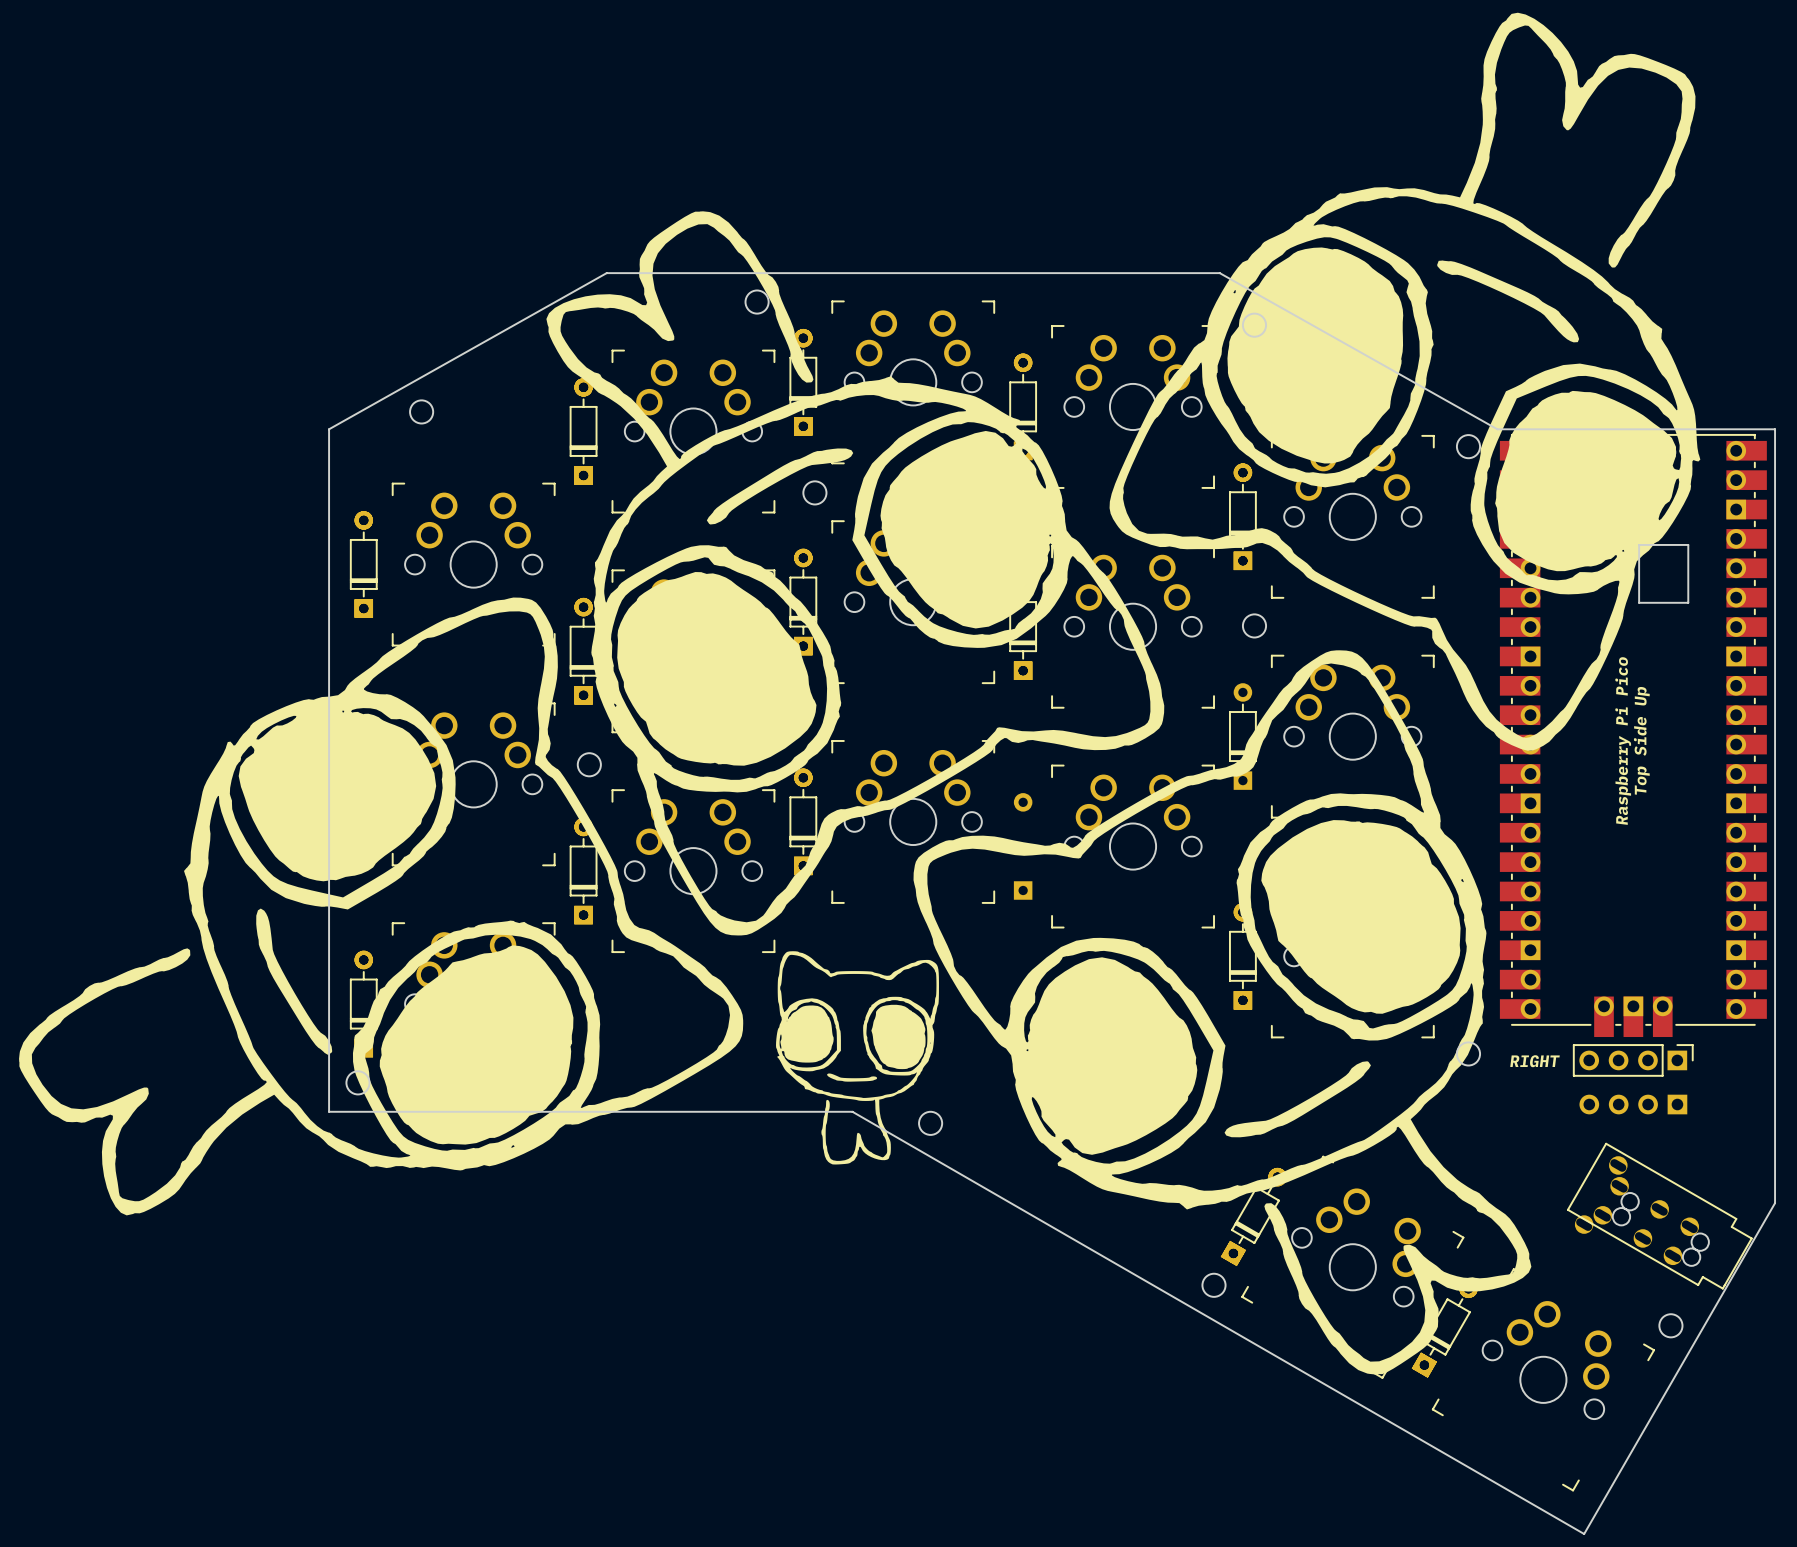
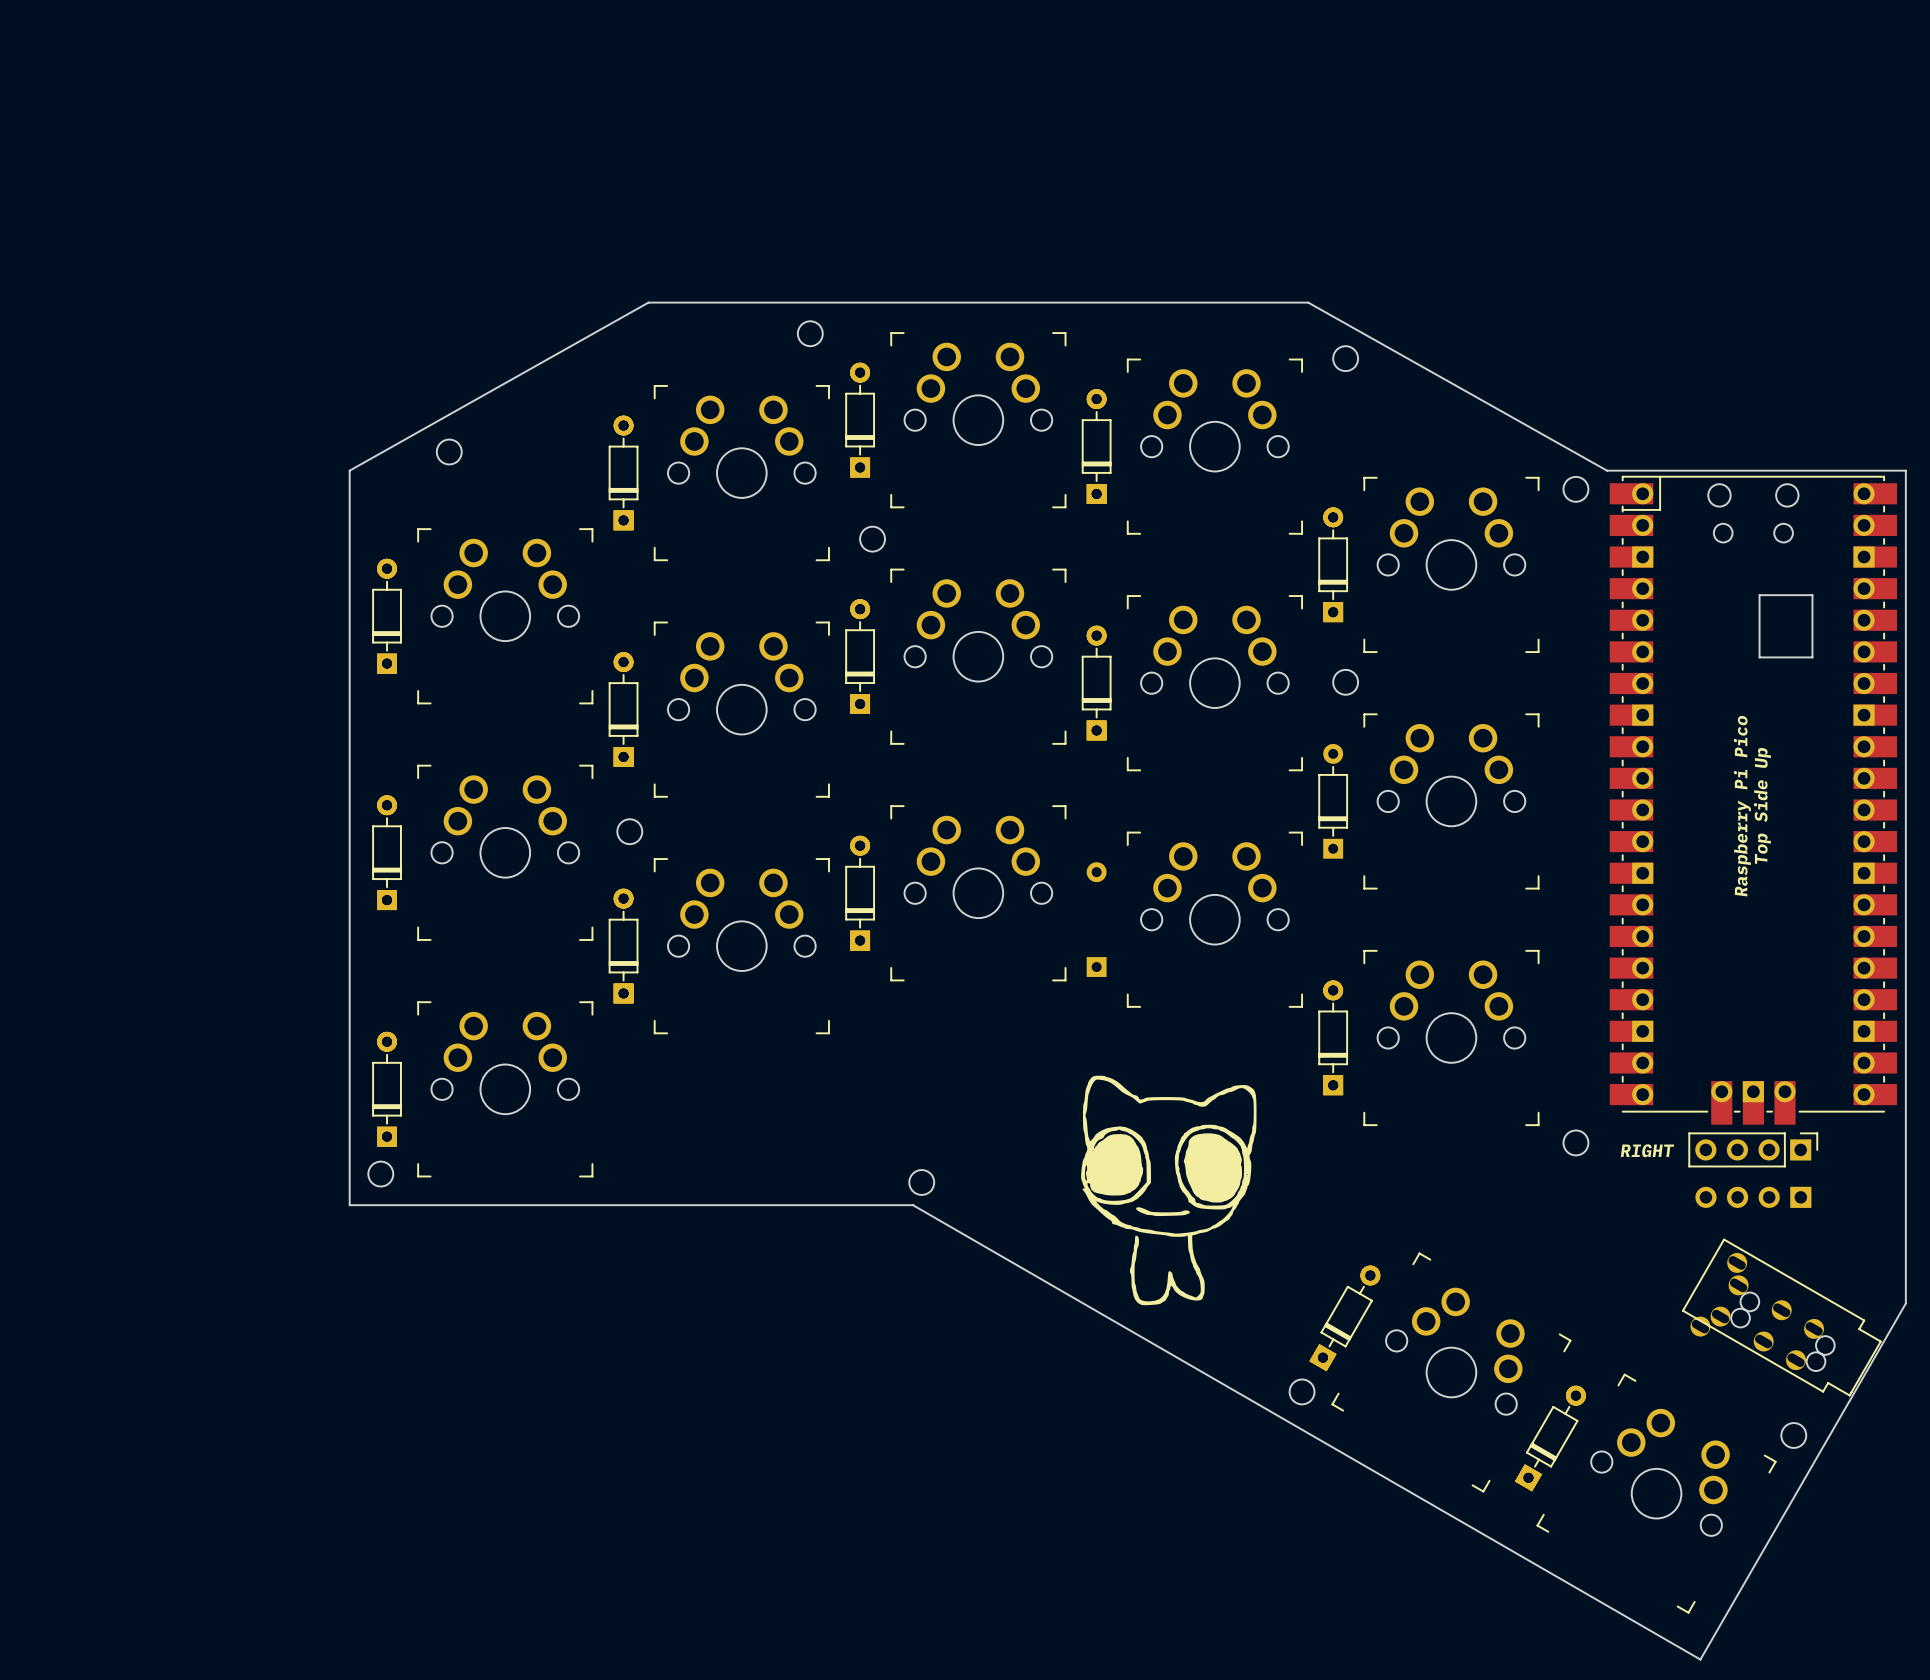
drawing: [19, 12, 1701, 1375] -> none
drawing position: (857, 1057) -> (1168, 1190)
round board edge position: (930, 1123) -> (921, 1182)

